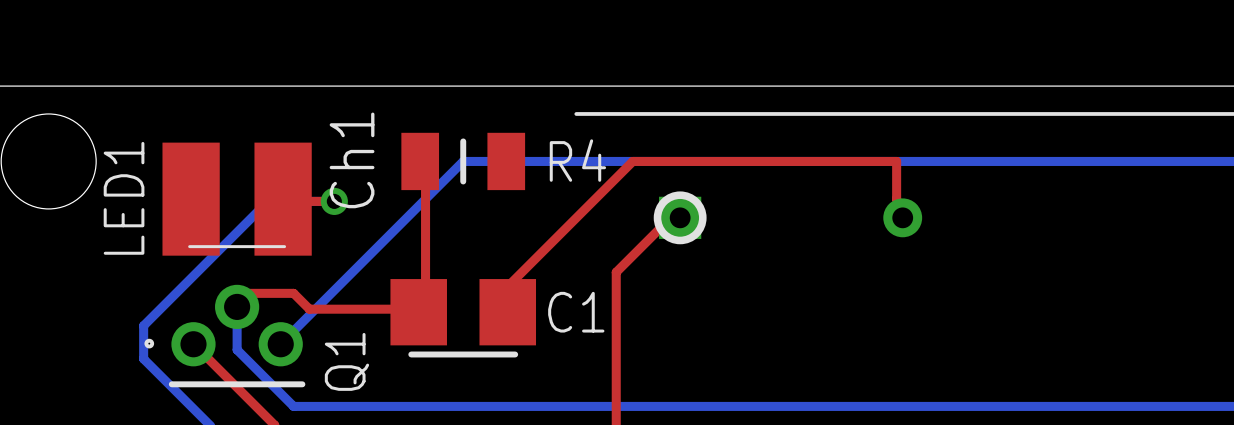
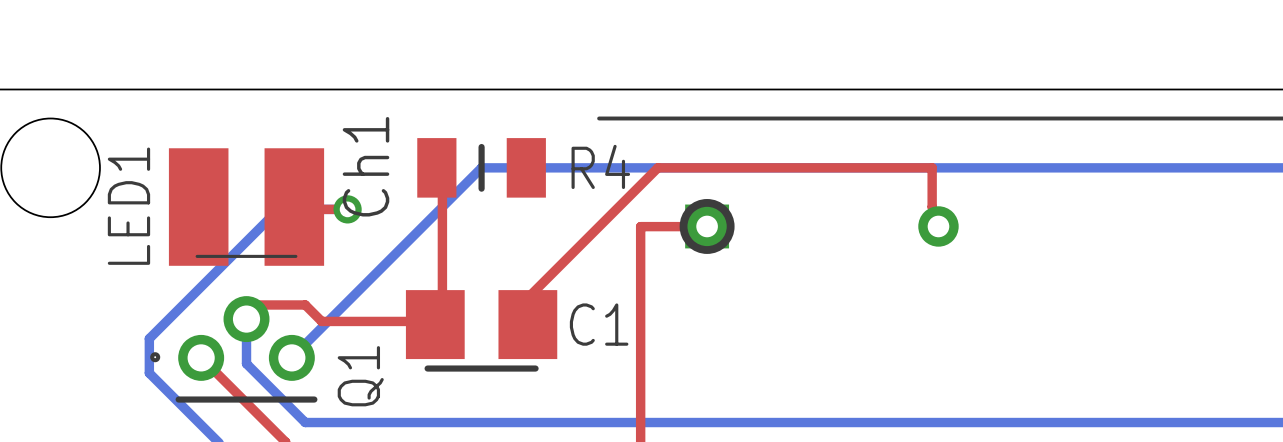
top track: (670, 217) (616, 272) -> (697, 226) (640, 226) (640, 283)

